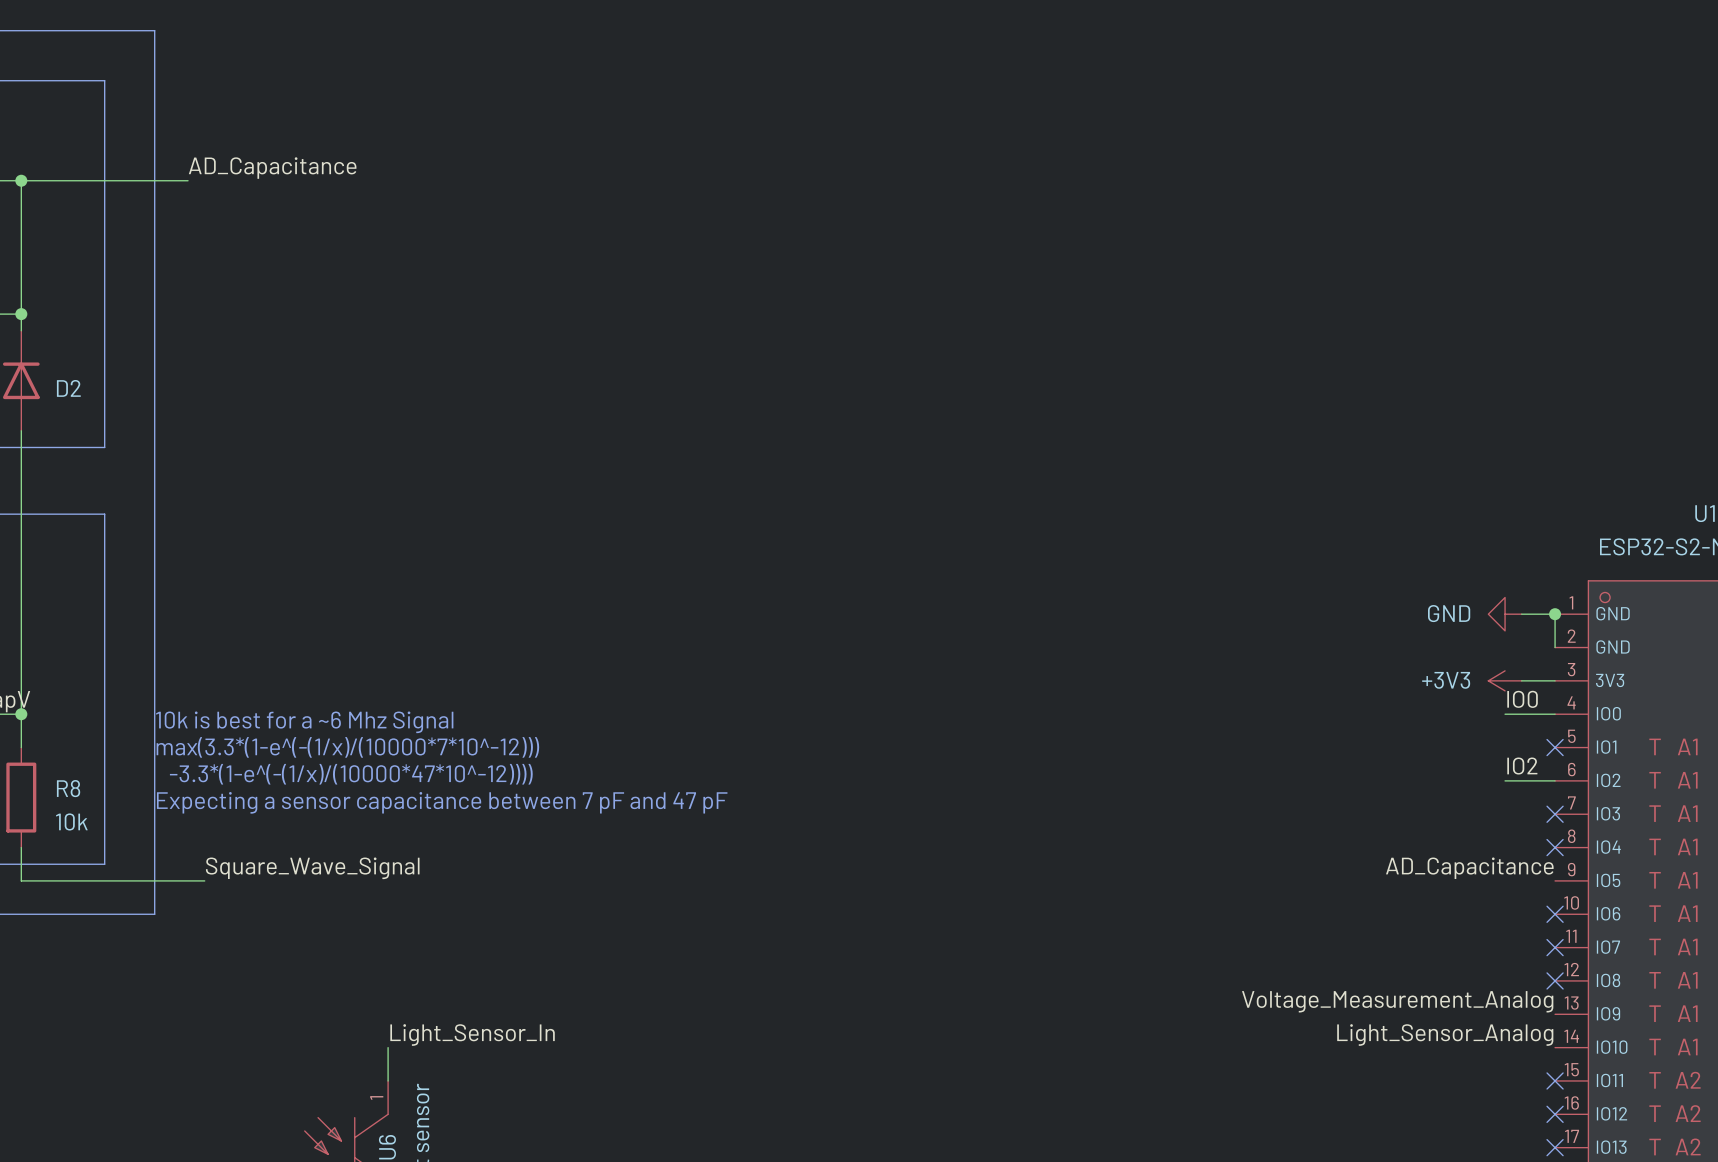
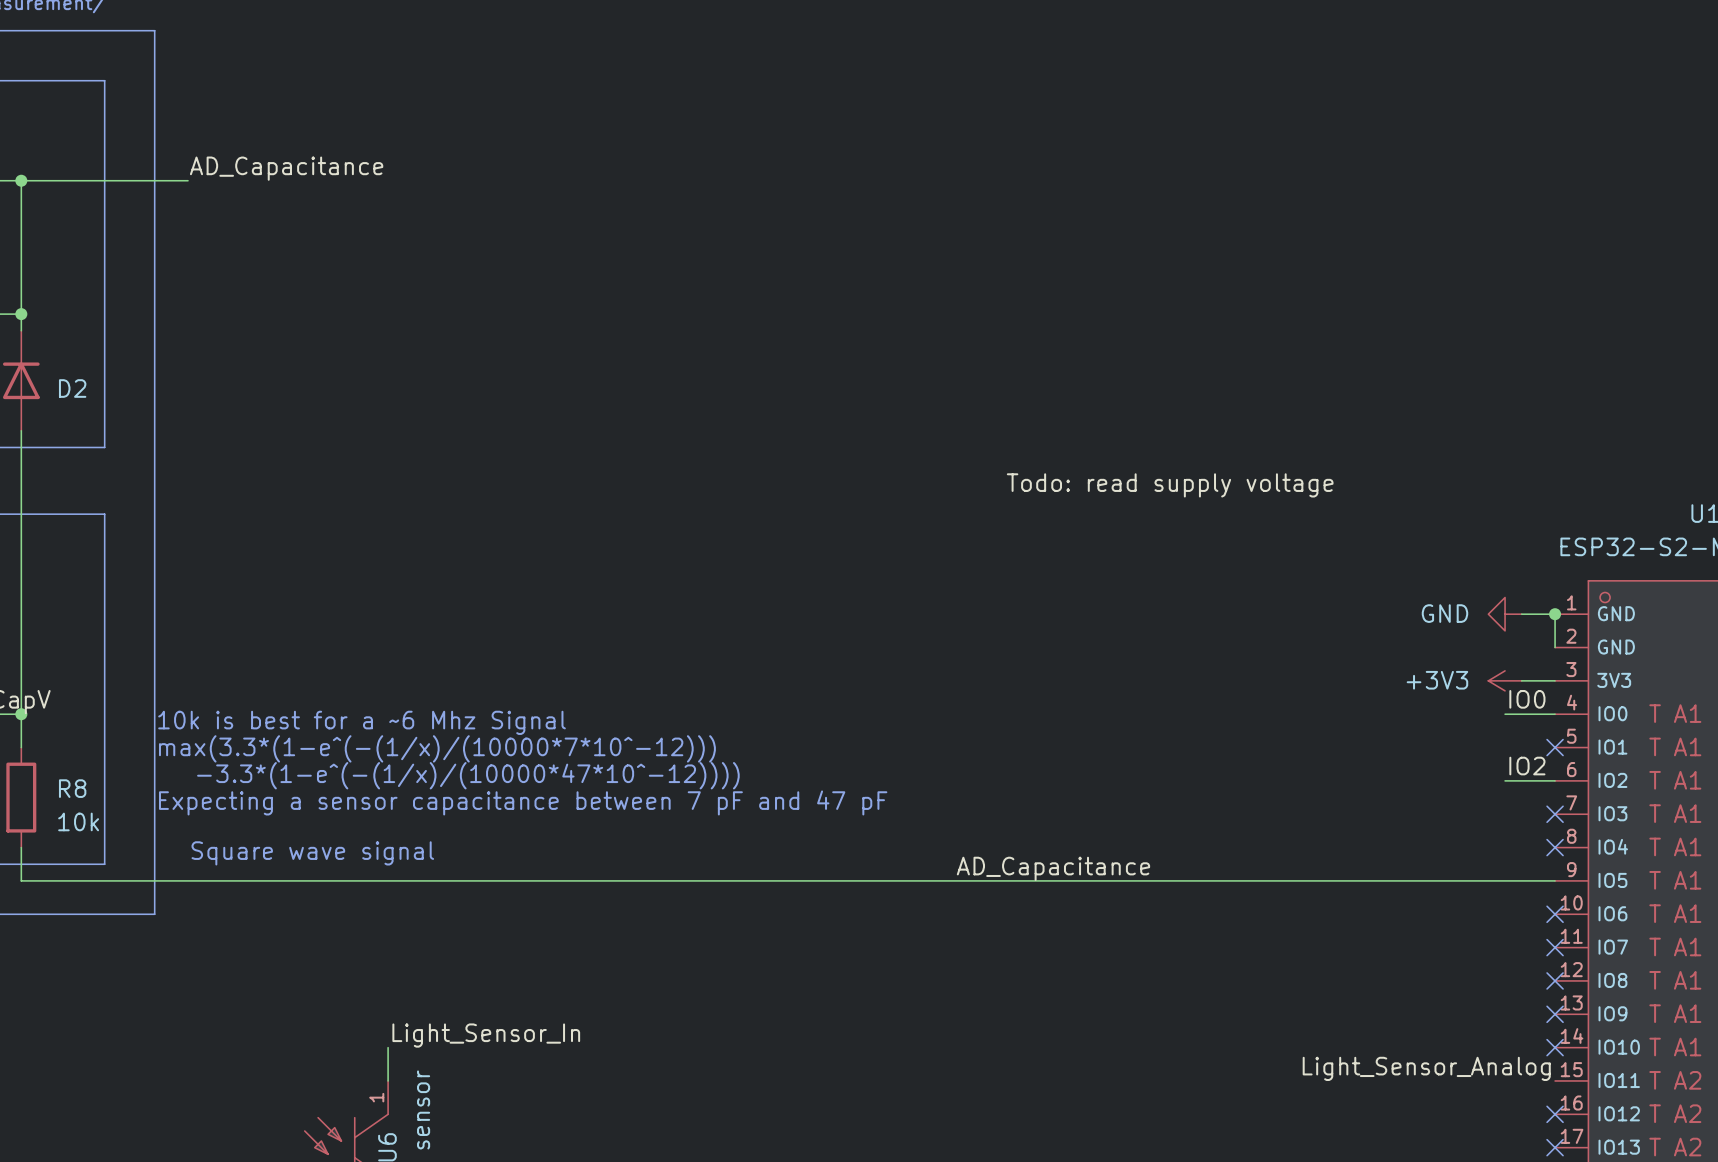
label: none -> Todo: read supply voltage (1170, 485)
U1 text: none -> T (1655, 713)
U1 text: none -> A1 (1687, 713)
text: none -> Square wave signal (312, 853)
label: Square_Wave_Signal (312, 868) -> none
label: none -> AD_Capacitance (1053, 868)
label: AD_Capacitance (1469, 868) -> none
wire: none -> (204, 880) (1555, 880)
label: Voltage_Measurement_Analog (1397, 1001) -> none
no-connect mark: none -> (1555, 1014)
label position: Light_Sensor_Analog (1445, 1035) -> Light_Sensor_Analog (1426, 1068)
no-connect mark: none -> (1555, 1047)
no-connect mark: (1555, 1080) -> none

